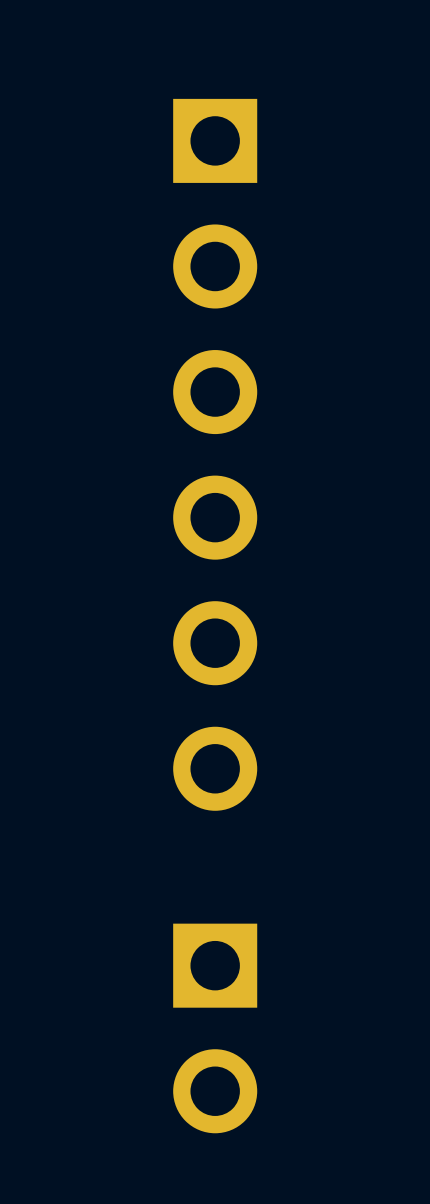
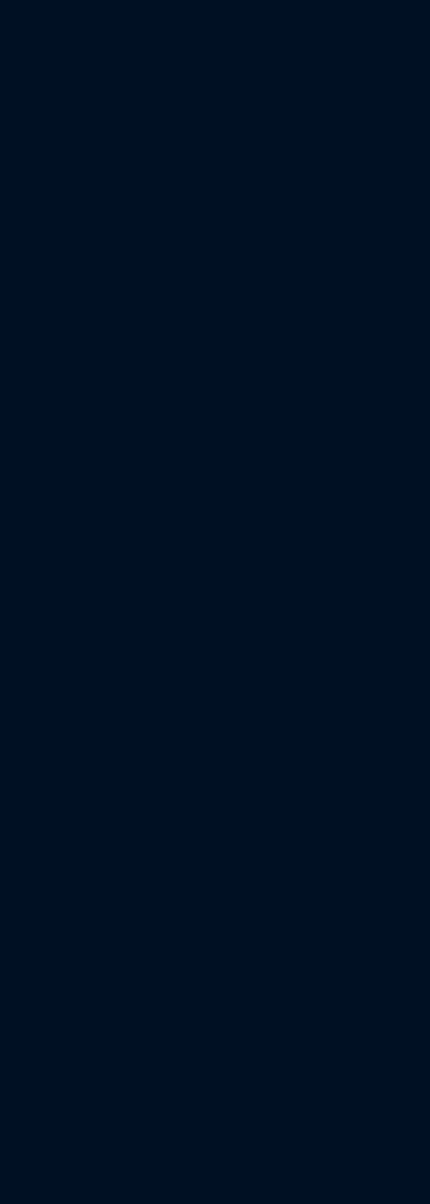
part: (215, 454) -> none
part: (215, 1028) -> none

